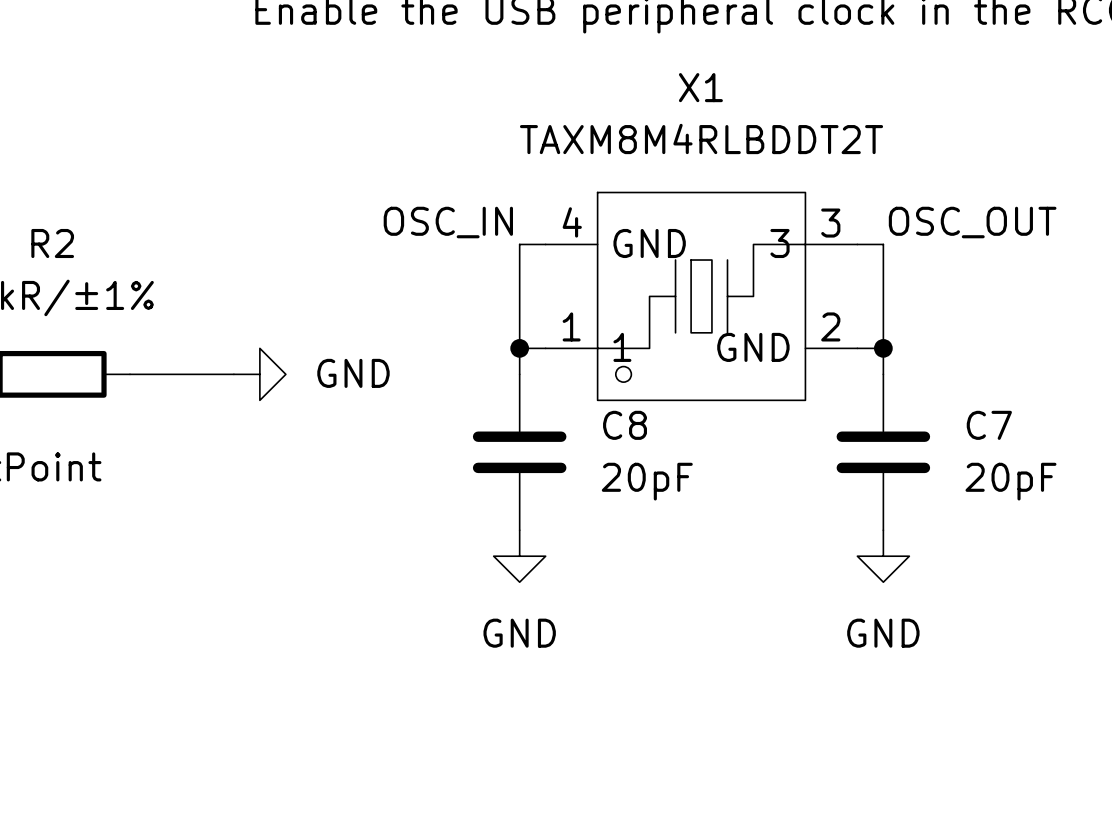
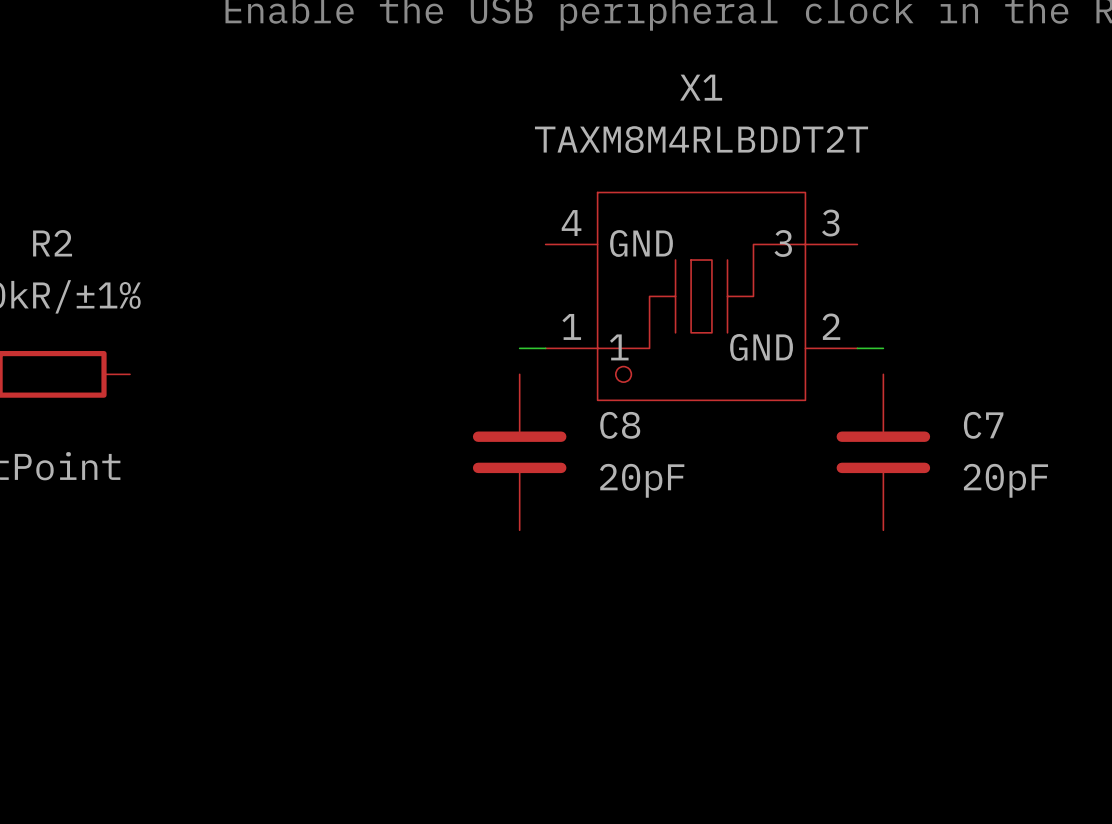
label: OSC_IN (448, 222) -> none
label: OSC_OUT (972, 222) -> none
wire: (545, 244) (519, 244) (519, 374) -> none
wire: (857, 244) (883, 244) (883, 374) -> none
junction: (519, 348) -> none
junction: (883, 348) -> none
wire: (129, 374) (233, 374) -> none
power symbol: GND (259, 374) -> none
power symbol: GND (519, 556) -> none
power symbol: GND (883, 556) -> none

